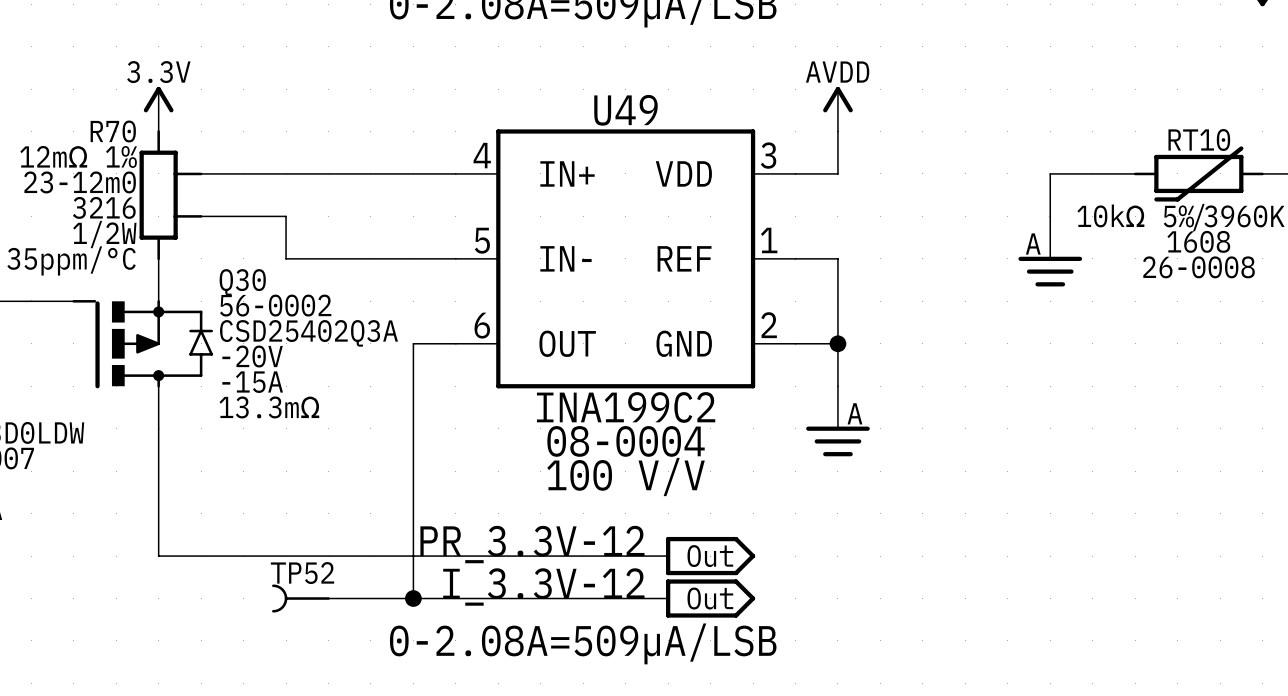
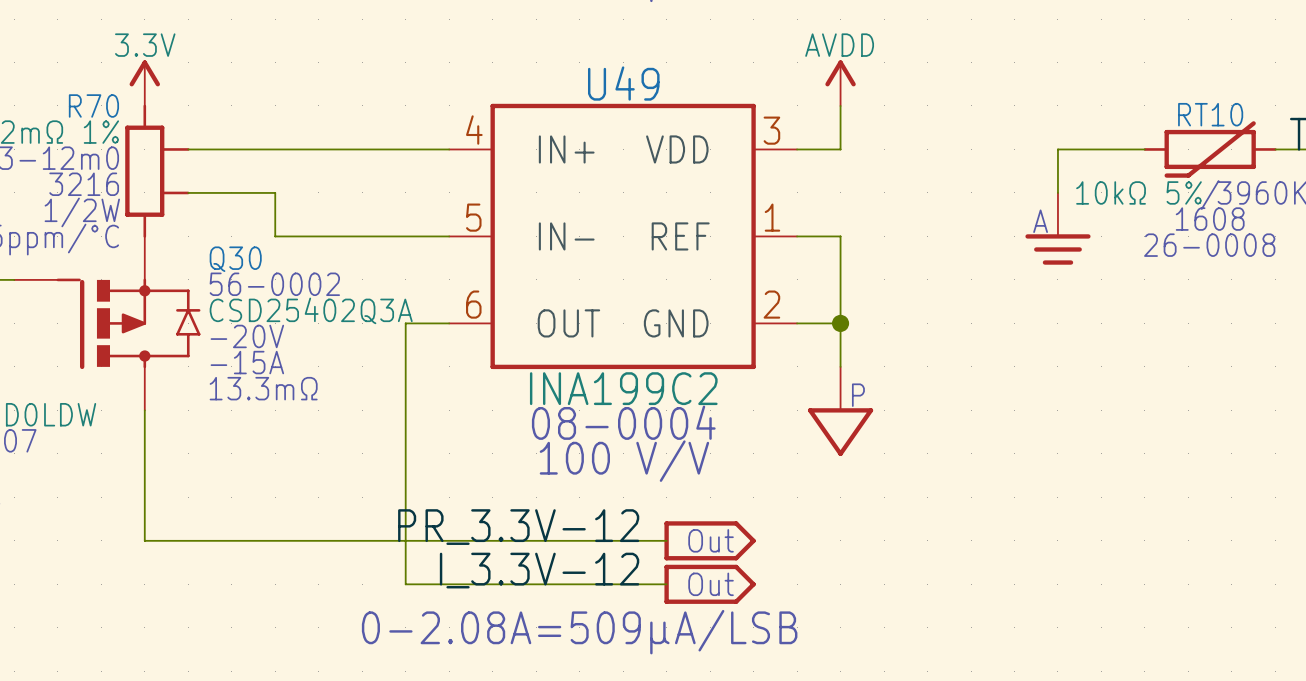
power symbol shape: [806, 386, 870, 457] -> [807, 366, 874, 457]
TP52: (300, 598) -> none
wire: (328, 598) (413, 598) -> none
junction: (413, 598) -> none

